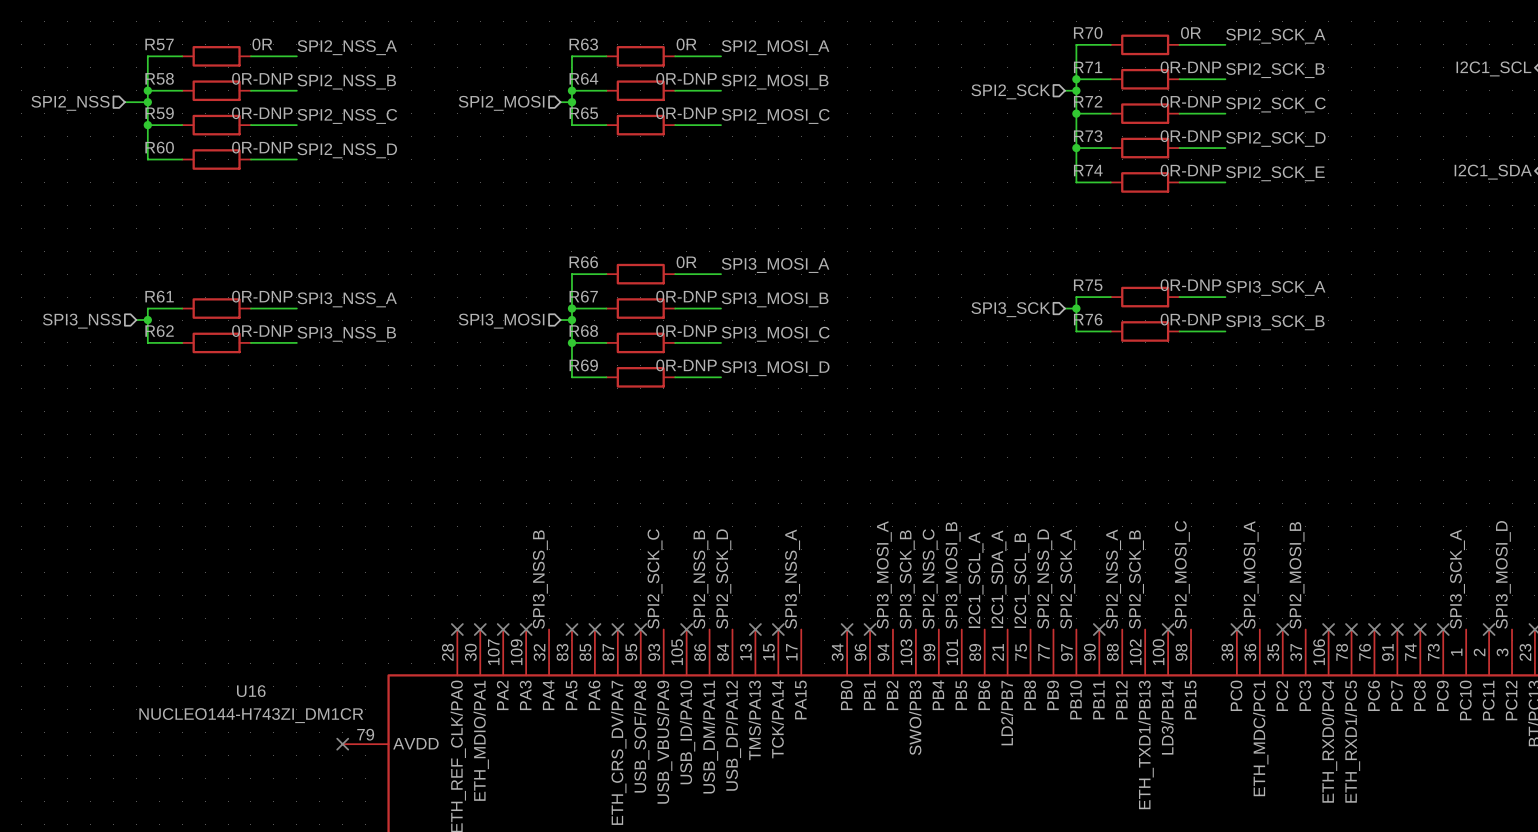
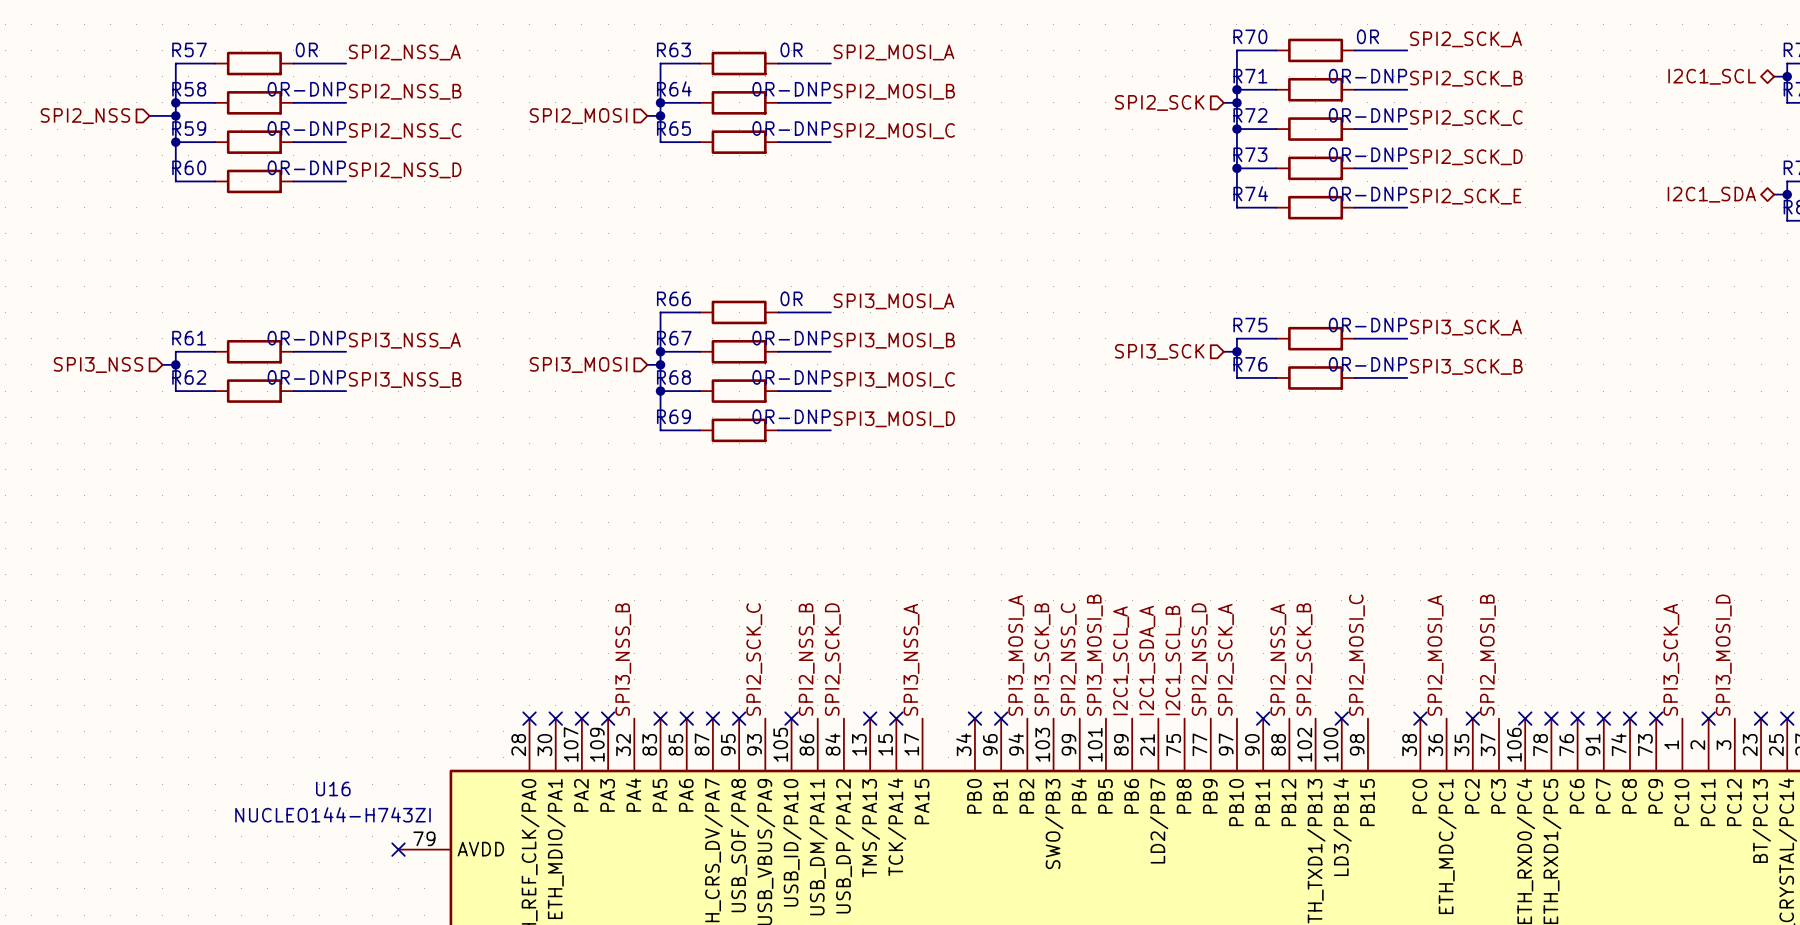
U16 name position: U16 (251, 691) -> U16 (333, 788)
U16 value: NUCLEO144-H743ZI_DM1CR (251, 715) -> NUCLEO144-H743ZI (333, 814)

